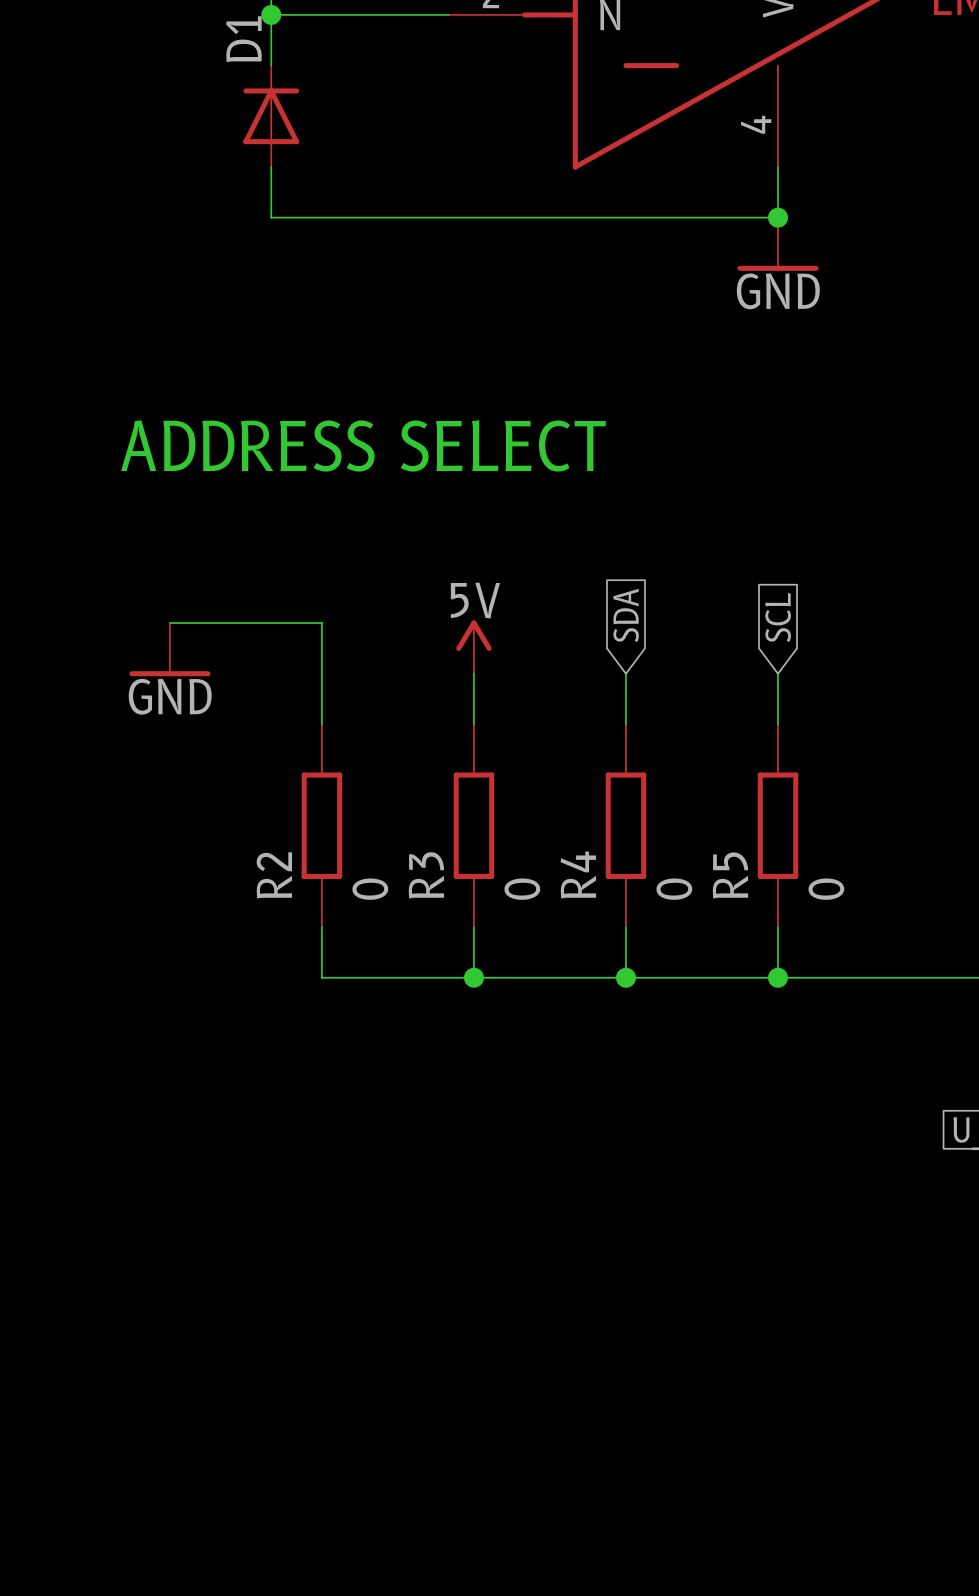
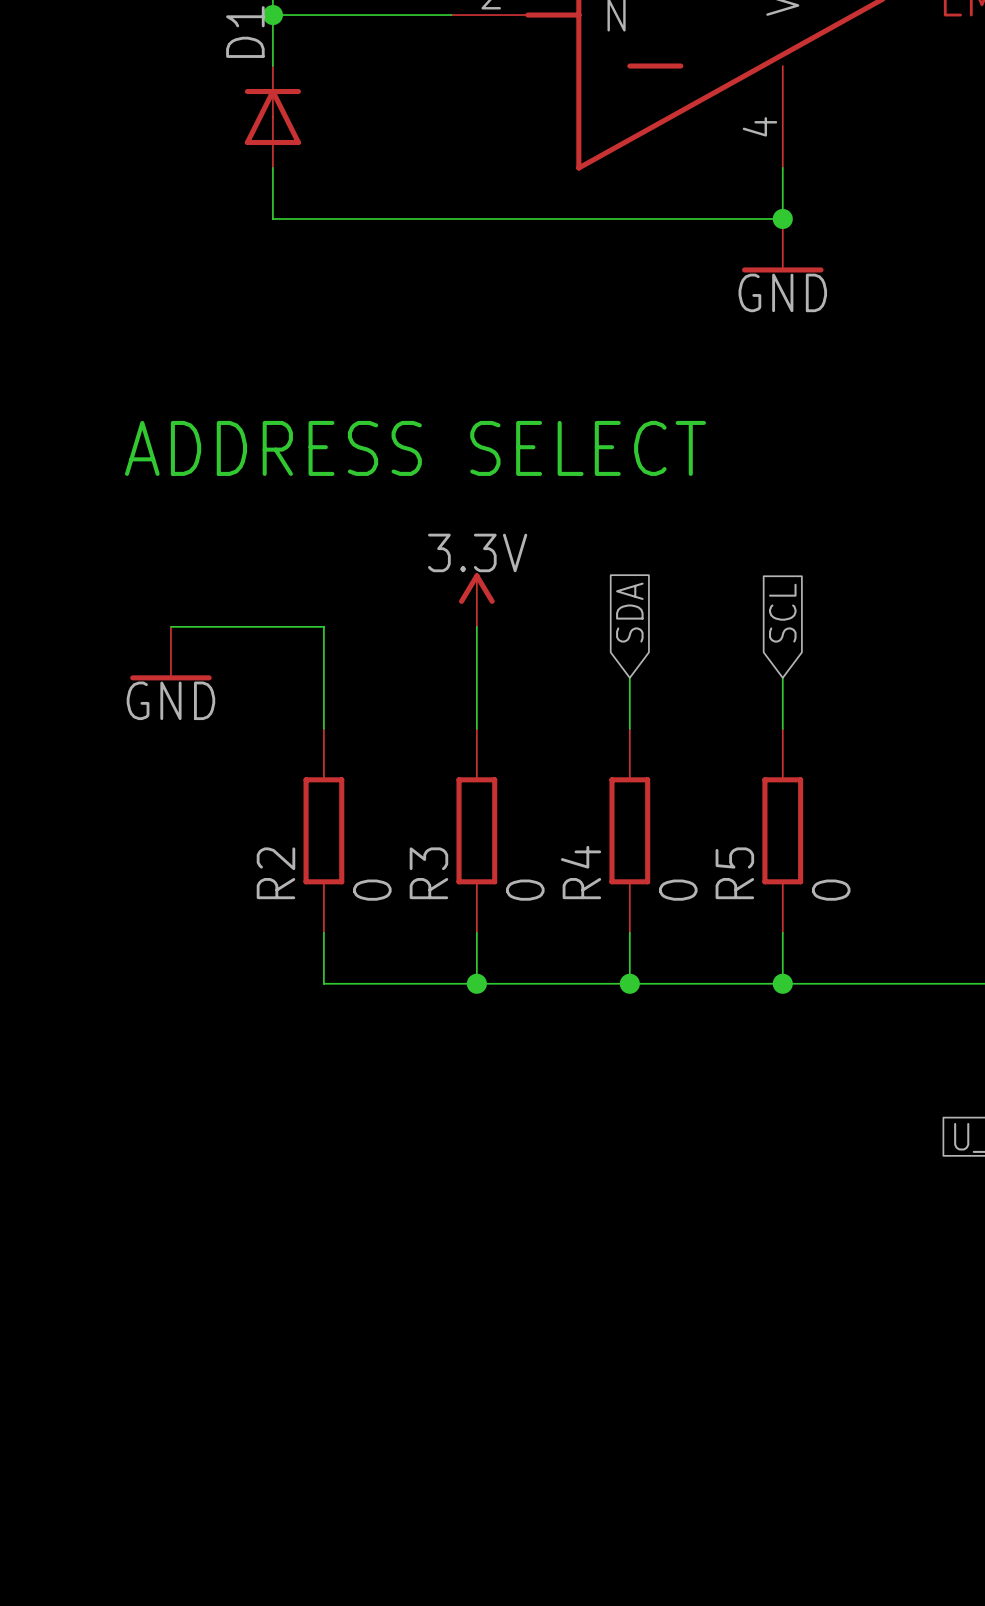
power symbol: none -> 3.3V (476, 600)
power symbol: 5V (473, 647) -> none

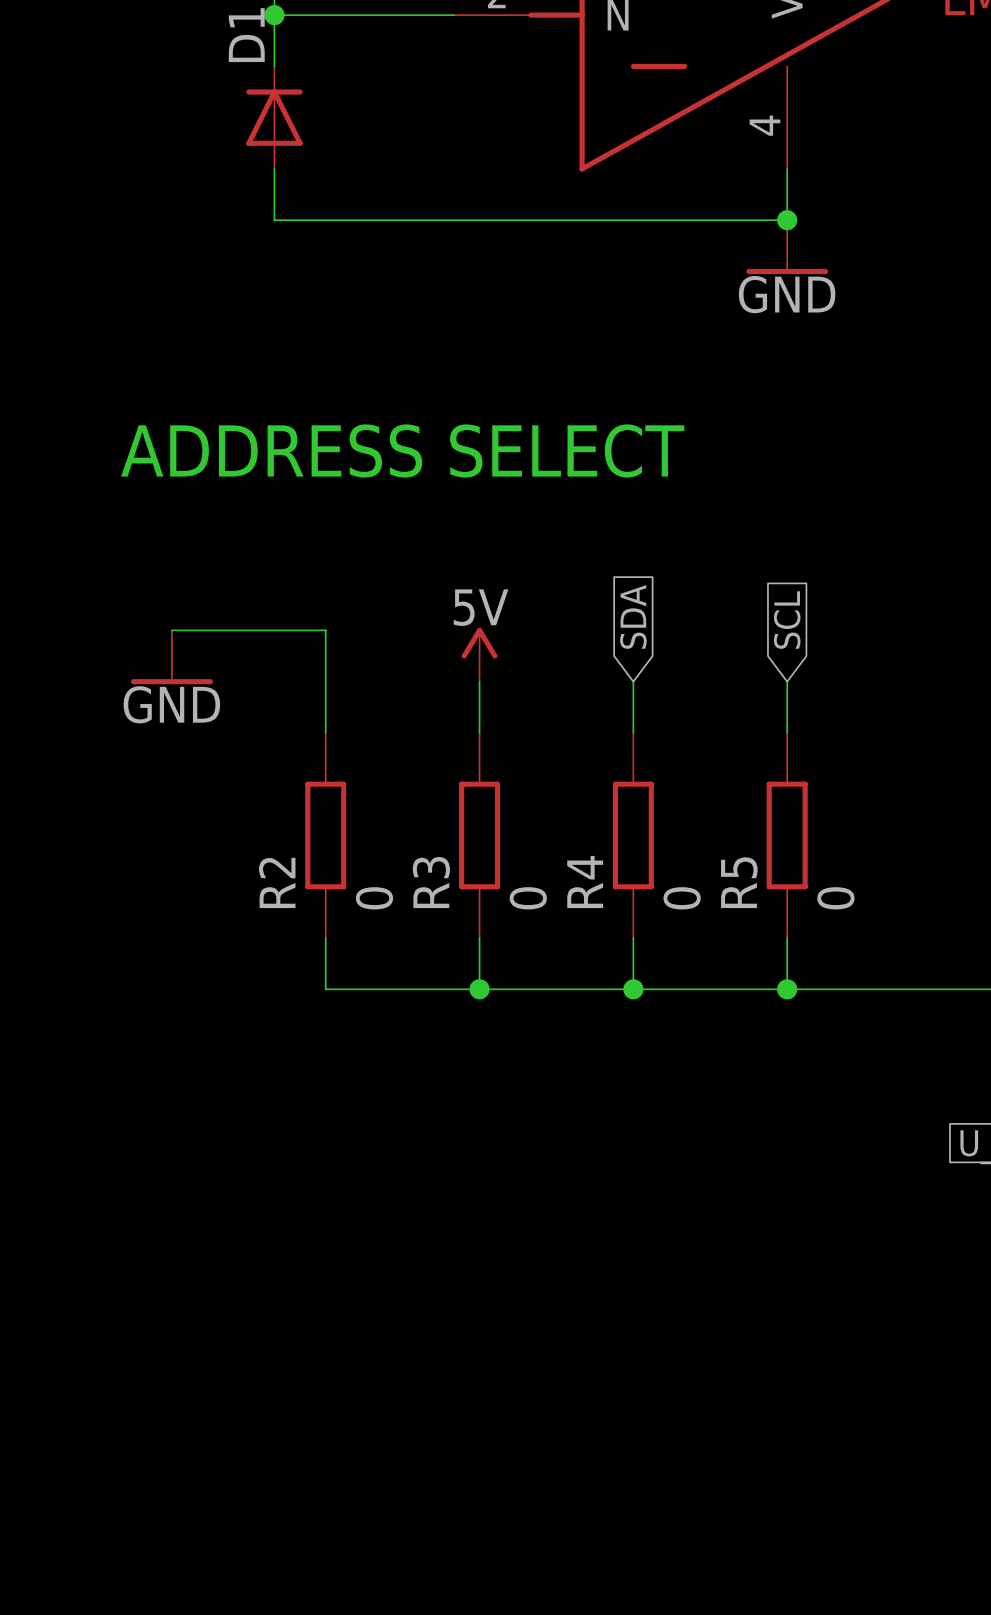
power symbol: 3.3V (476, 600) -> none
power symbol: none -> 5V (479, 654)

